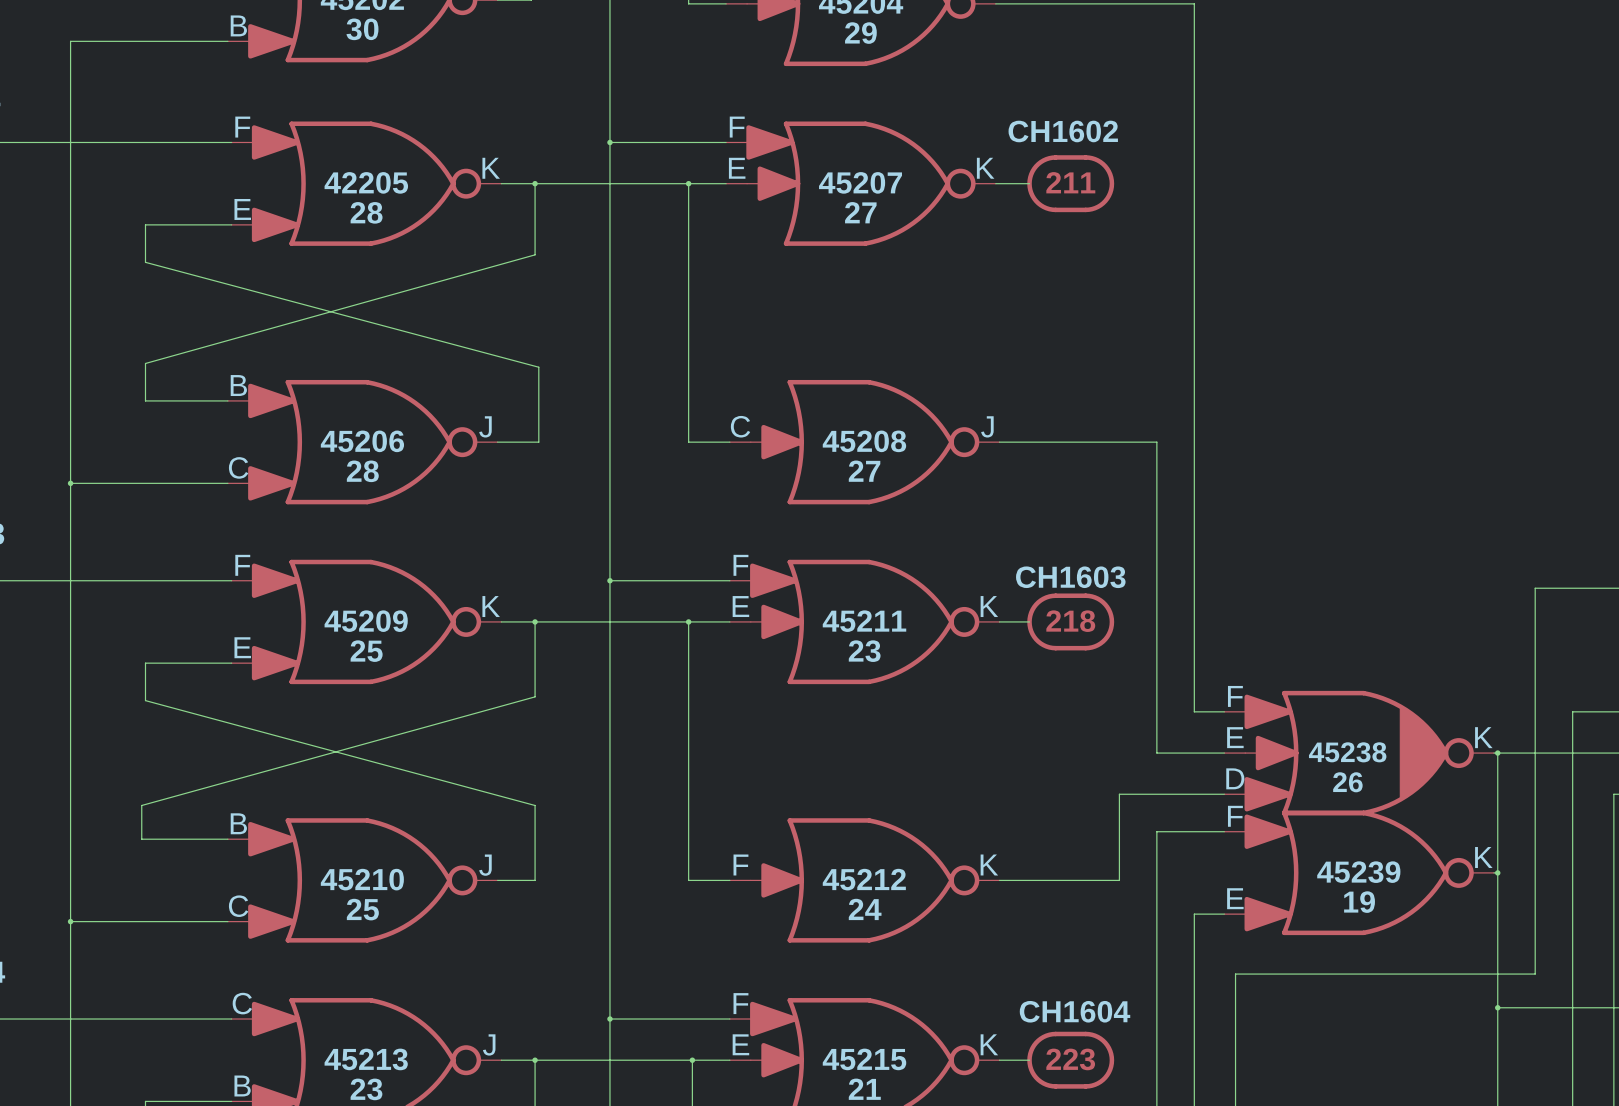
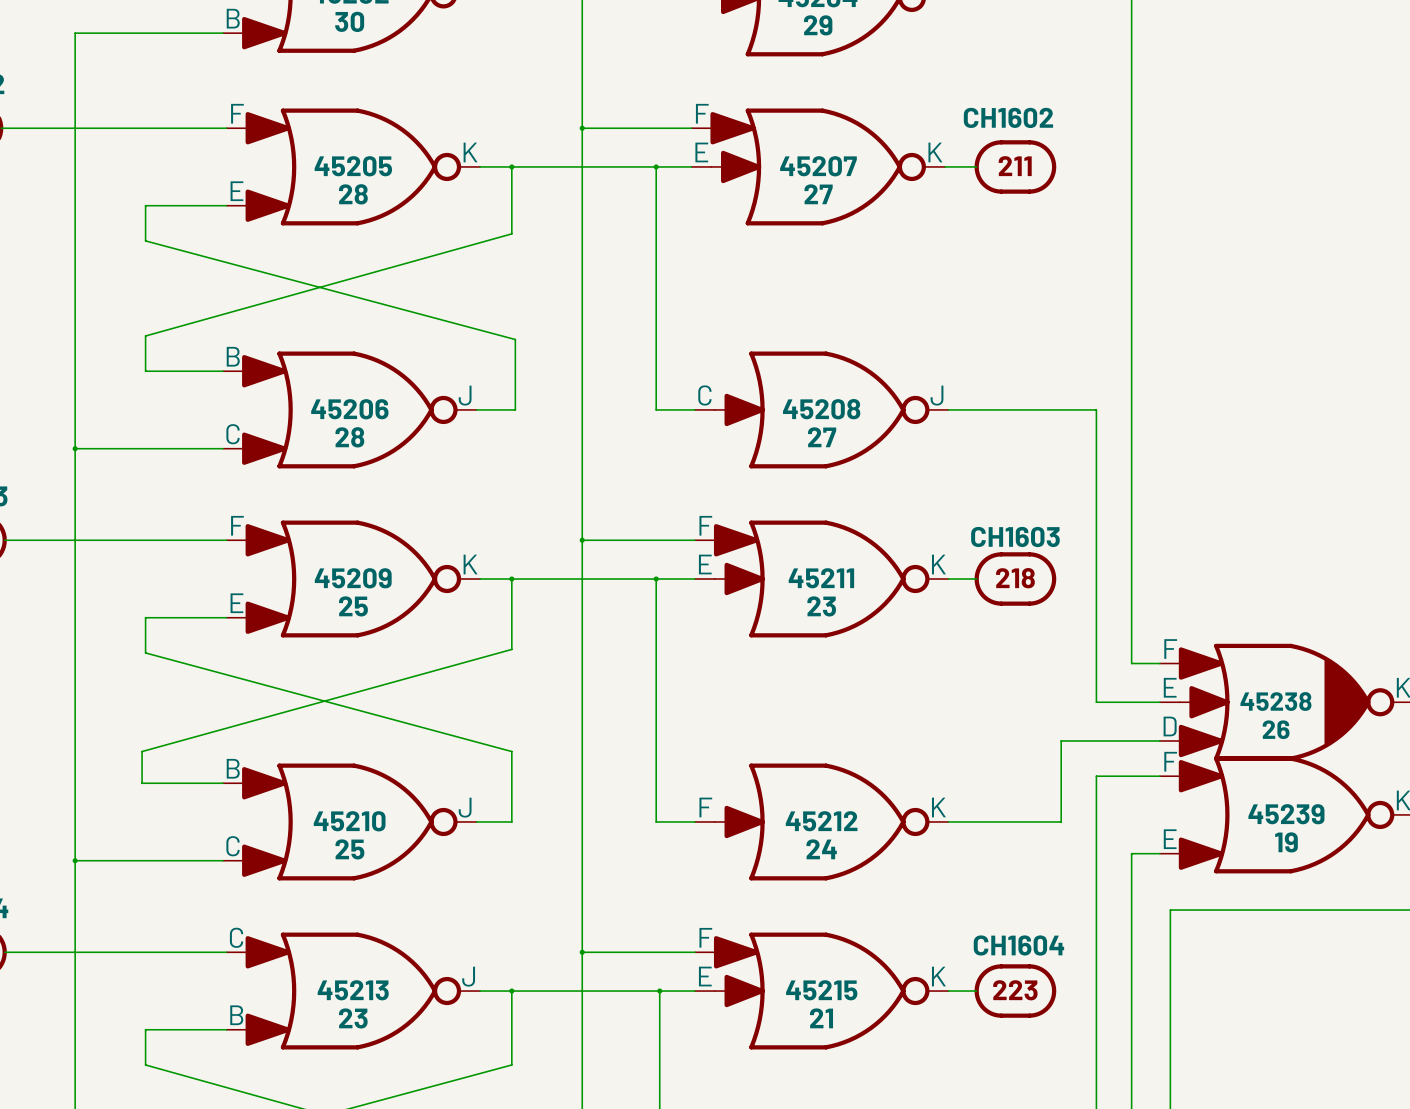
part text: 42205 (366, 182) -> 45205 (353, 166)

